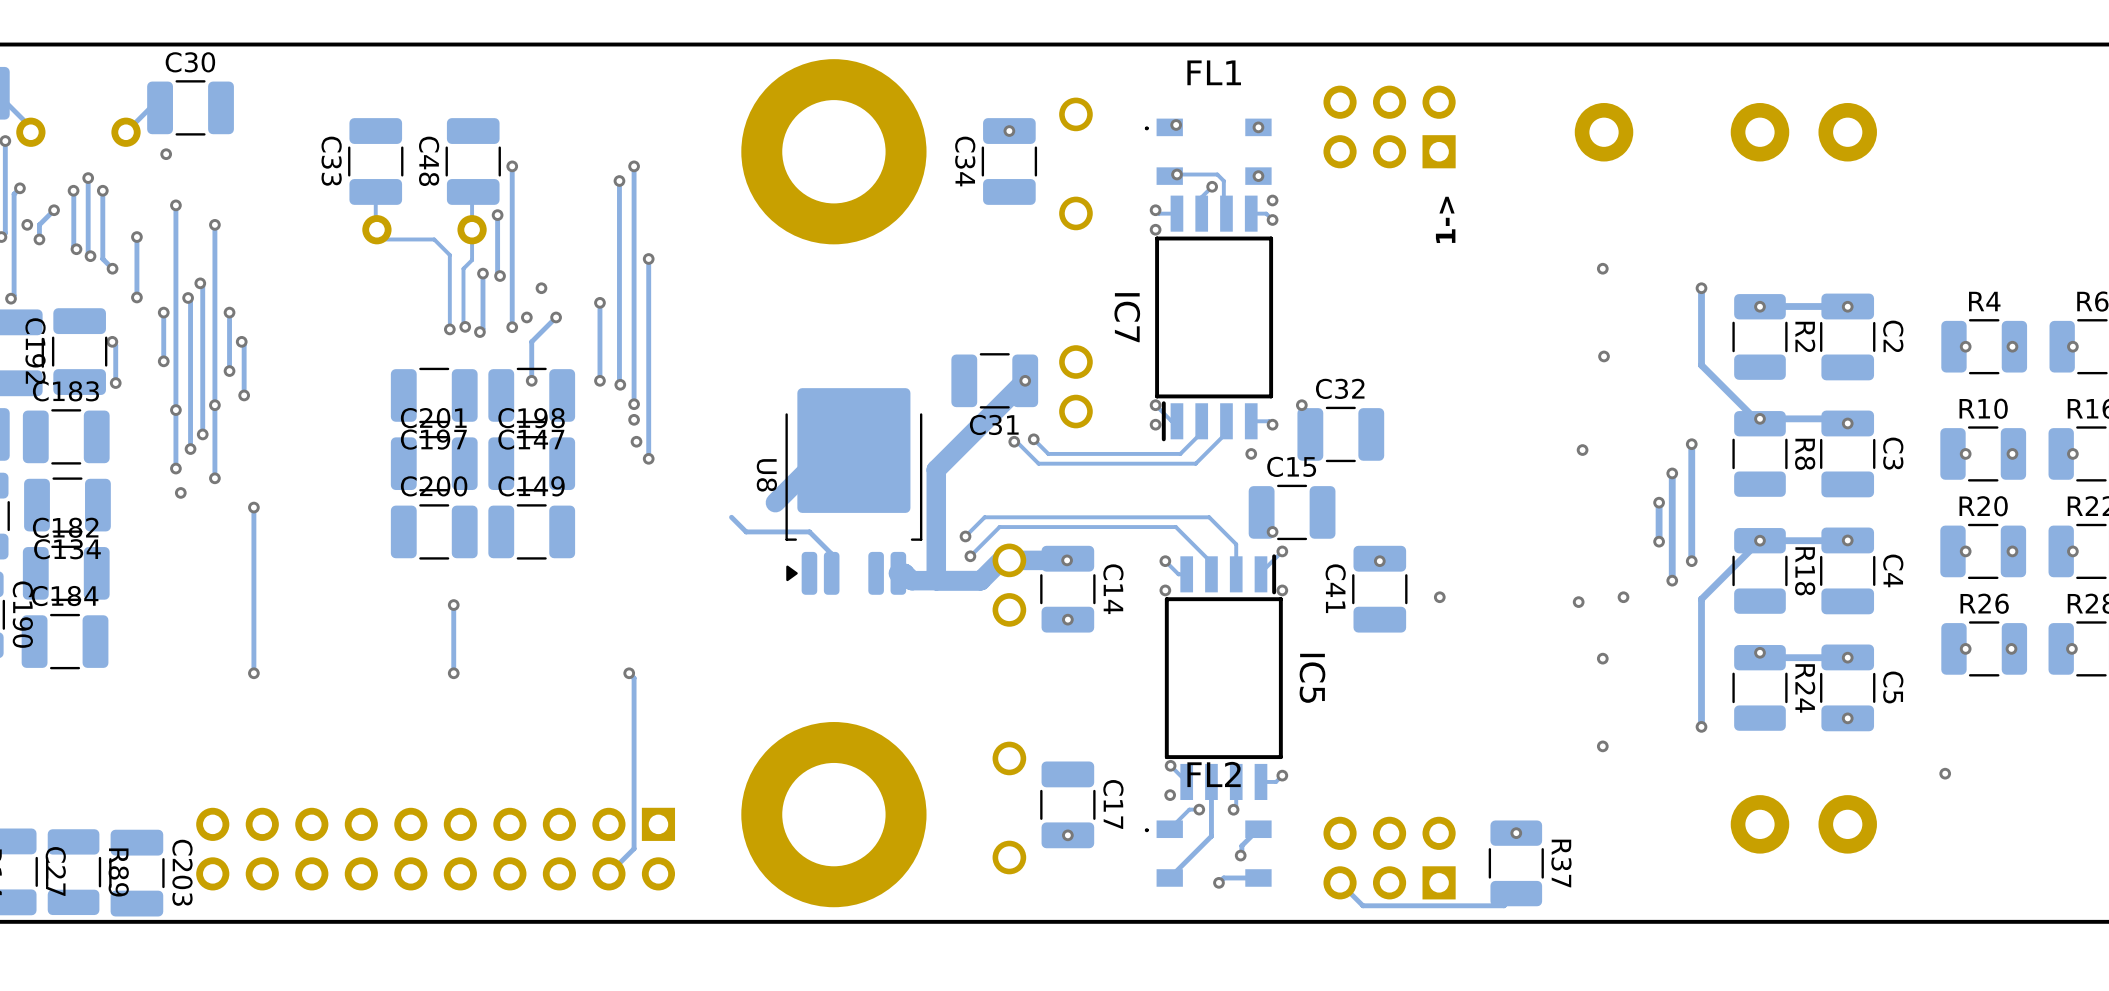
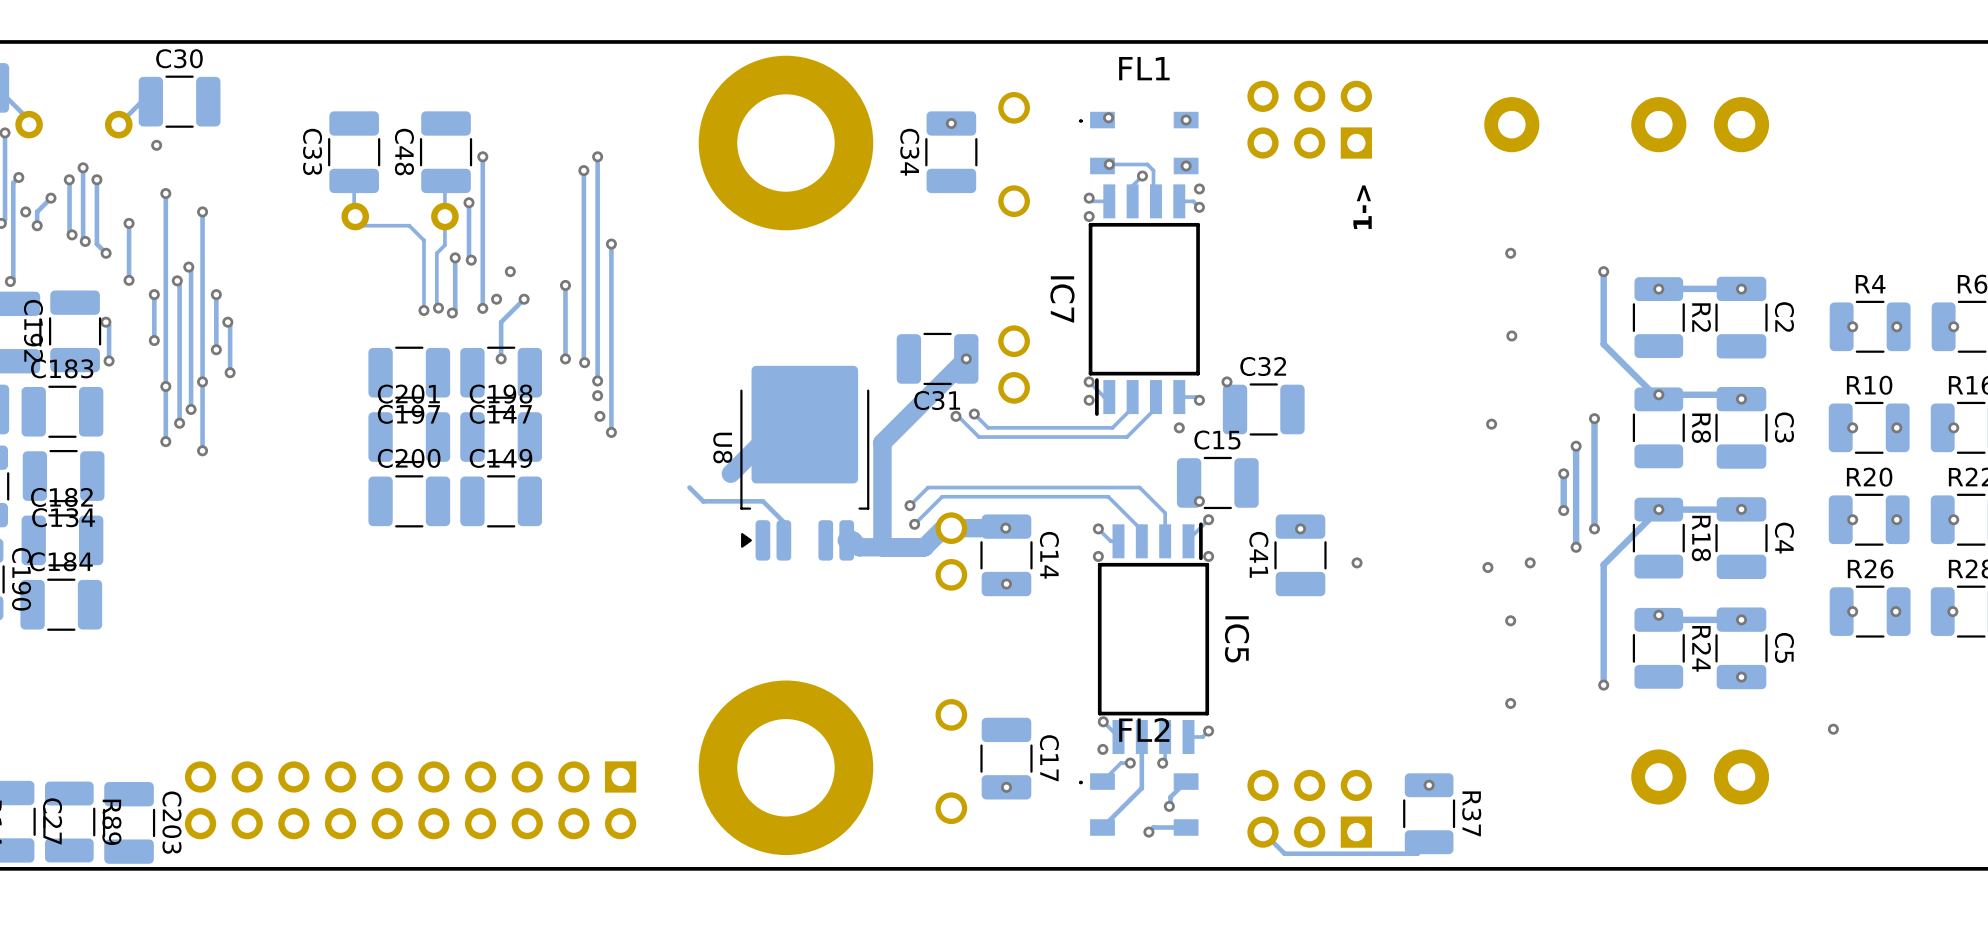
via: (180, 492) -> none
track: (253, 507) (253, 673) -> none
via: (253, 507) -> none
track: (453, 605) (453, 673) -> none
via: (453, 605) -> none
via: (253, 673) -> none
via: (453, 673) -> none
track: (629, 673) (634, 678) (634, 848) (608, 873) -> none
via: (629, 673) -> none

